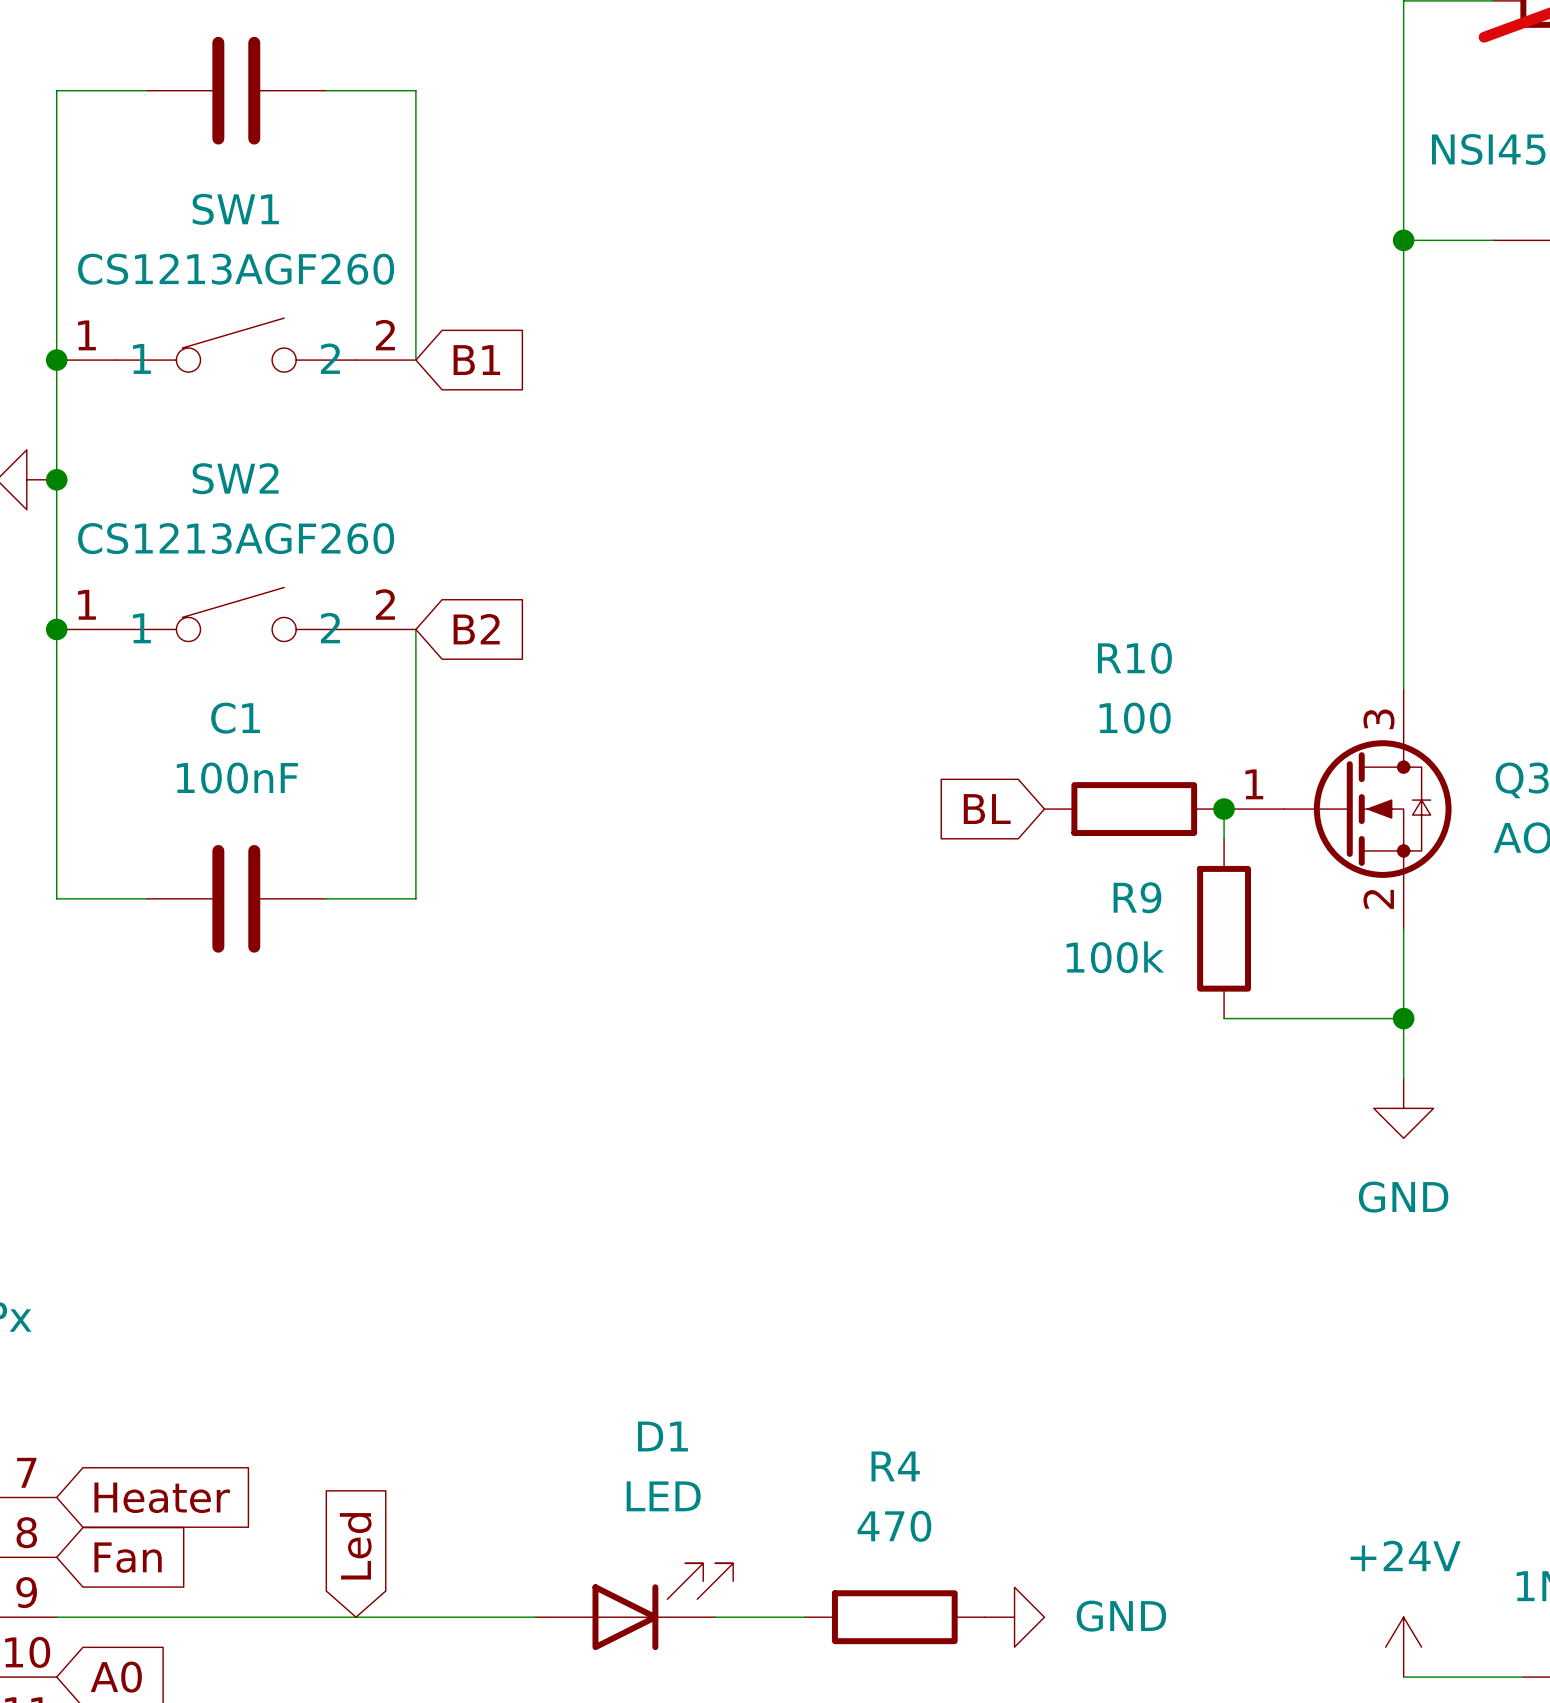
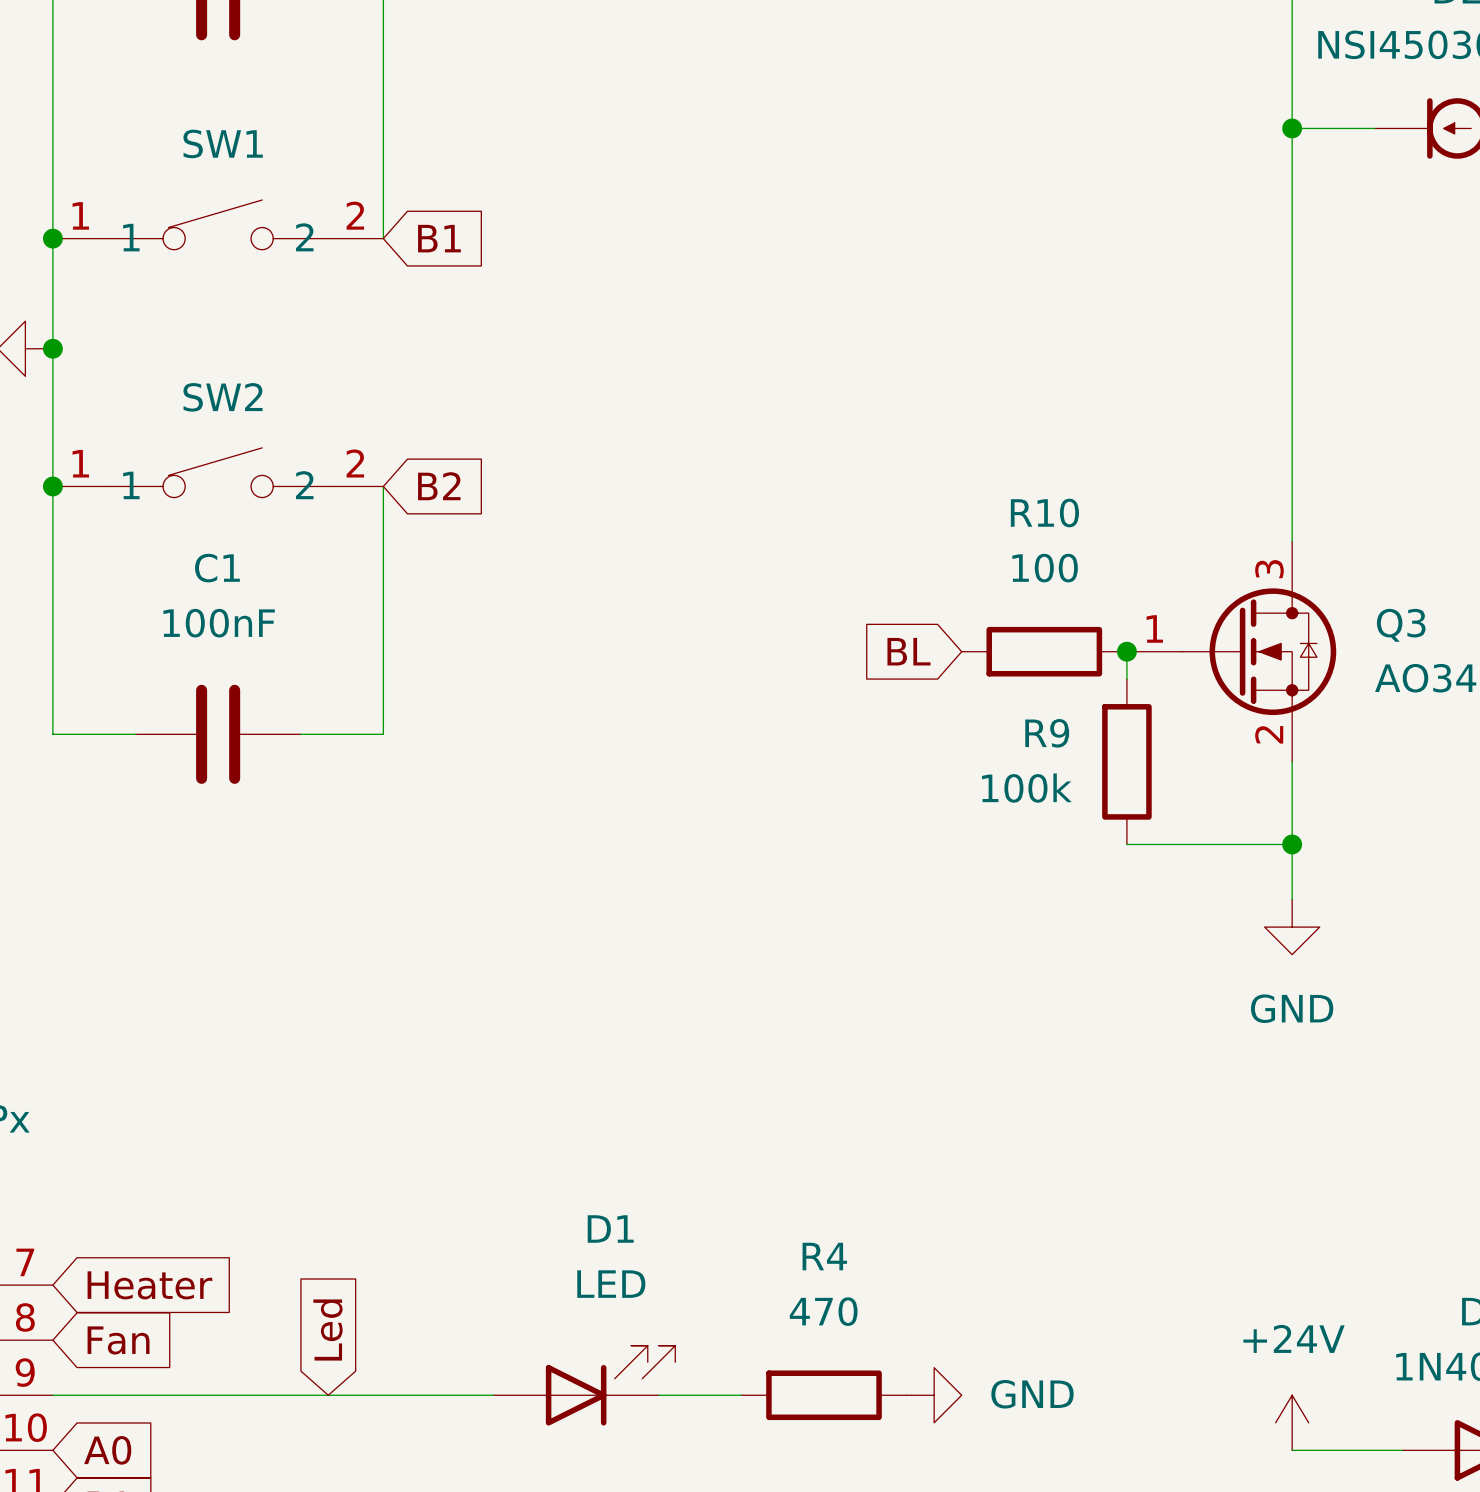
SW1 name position: SW1 (235, 209) -> SW1 (223, 143)
SW1 value: CS1213AGF260 (236, 269) -> none
SW2 name position: SW2 (235, 478) -> SW2 (223, 397)
SW2 value: CS1213AGF260 (236, 538) -> none

